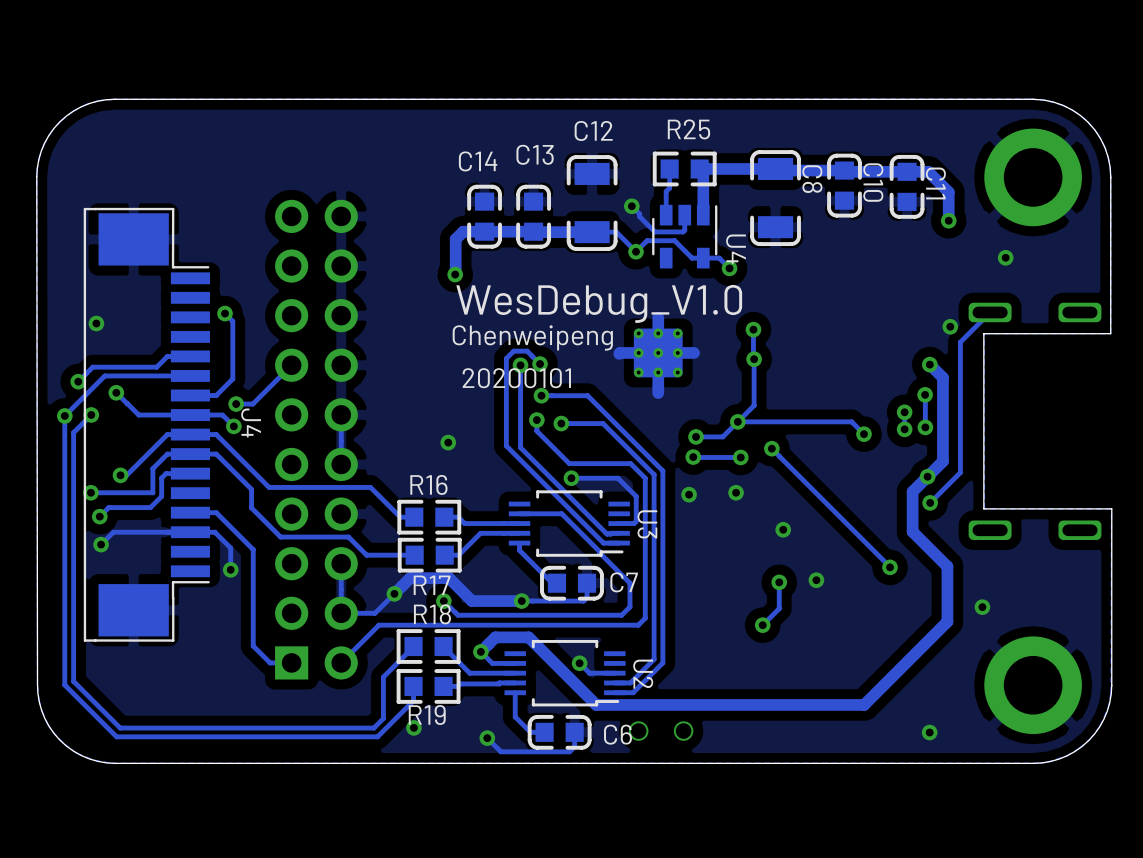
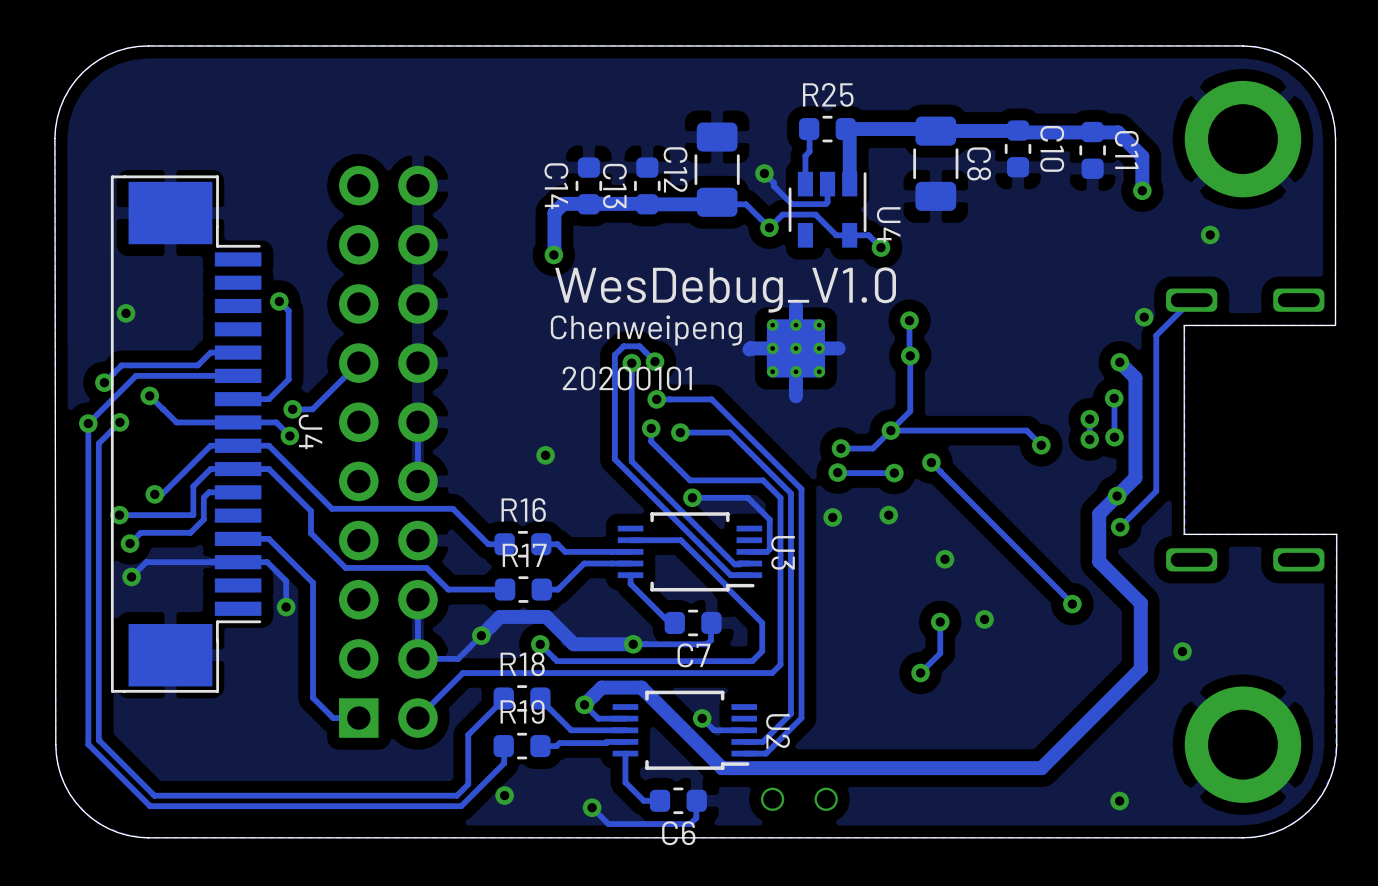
C12 name position: C12 (593, 130) -> C12 (675, 169)
C8 footprint: [750, 150, 801, 247] -> [913, 116, 959, 211]
R25 footprint: [652, 151, 717, 187] -> [798, 115, 857, 143]
C10 footprint: [827, 153, 862, 218] -> [1004, 120, 1032, 178]
C13 name position: C13 (535, 154) -> C13 (614, 186)
C11 footprint: [889, 154, 925, 219] -> [1079, 121, 1106, 179]
C12 footprint: [566, 155, 618, 251] -> [694, 122, 740, 217]
C14 name position: C14 (478, 161) -> C14 (556, 186)
C14 footprint: [467, 184, 502, 249] -> [575, 157, 603, 215]
C13 footprint: [516, 184, 551, 249] -> [634, 157, 661, 215]
R16 footprint: [397, 499, 462, 535] -> [494, 530, 552, 558]
R17 footprint: [397, 537, 462, 573] -> [494, 576, 552, 603]
C7 footprint: [540, 565, 604, 601] -> [664, 609, 722, 637]
C7 name position: C7 (624, 582) -> C7 (693, 655)
R17 name position: R17 (432, 585) -> R17 (524, 555)
R18 footprint: [396, 629, 461, 664] -> [493, 685, 551, 712]
R19 footprint: [396, 669, 461, 704] -> [493, 732, 551, 760]
R19 name position: R19 (427, 714) -> R19 (522, 711)
C6 footprint: [527, 714, 592, 750] -> [649, 787, 707, 815]
C6 name position: C6 (617, 734) -> C6 (678, 833)

